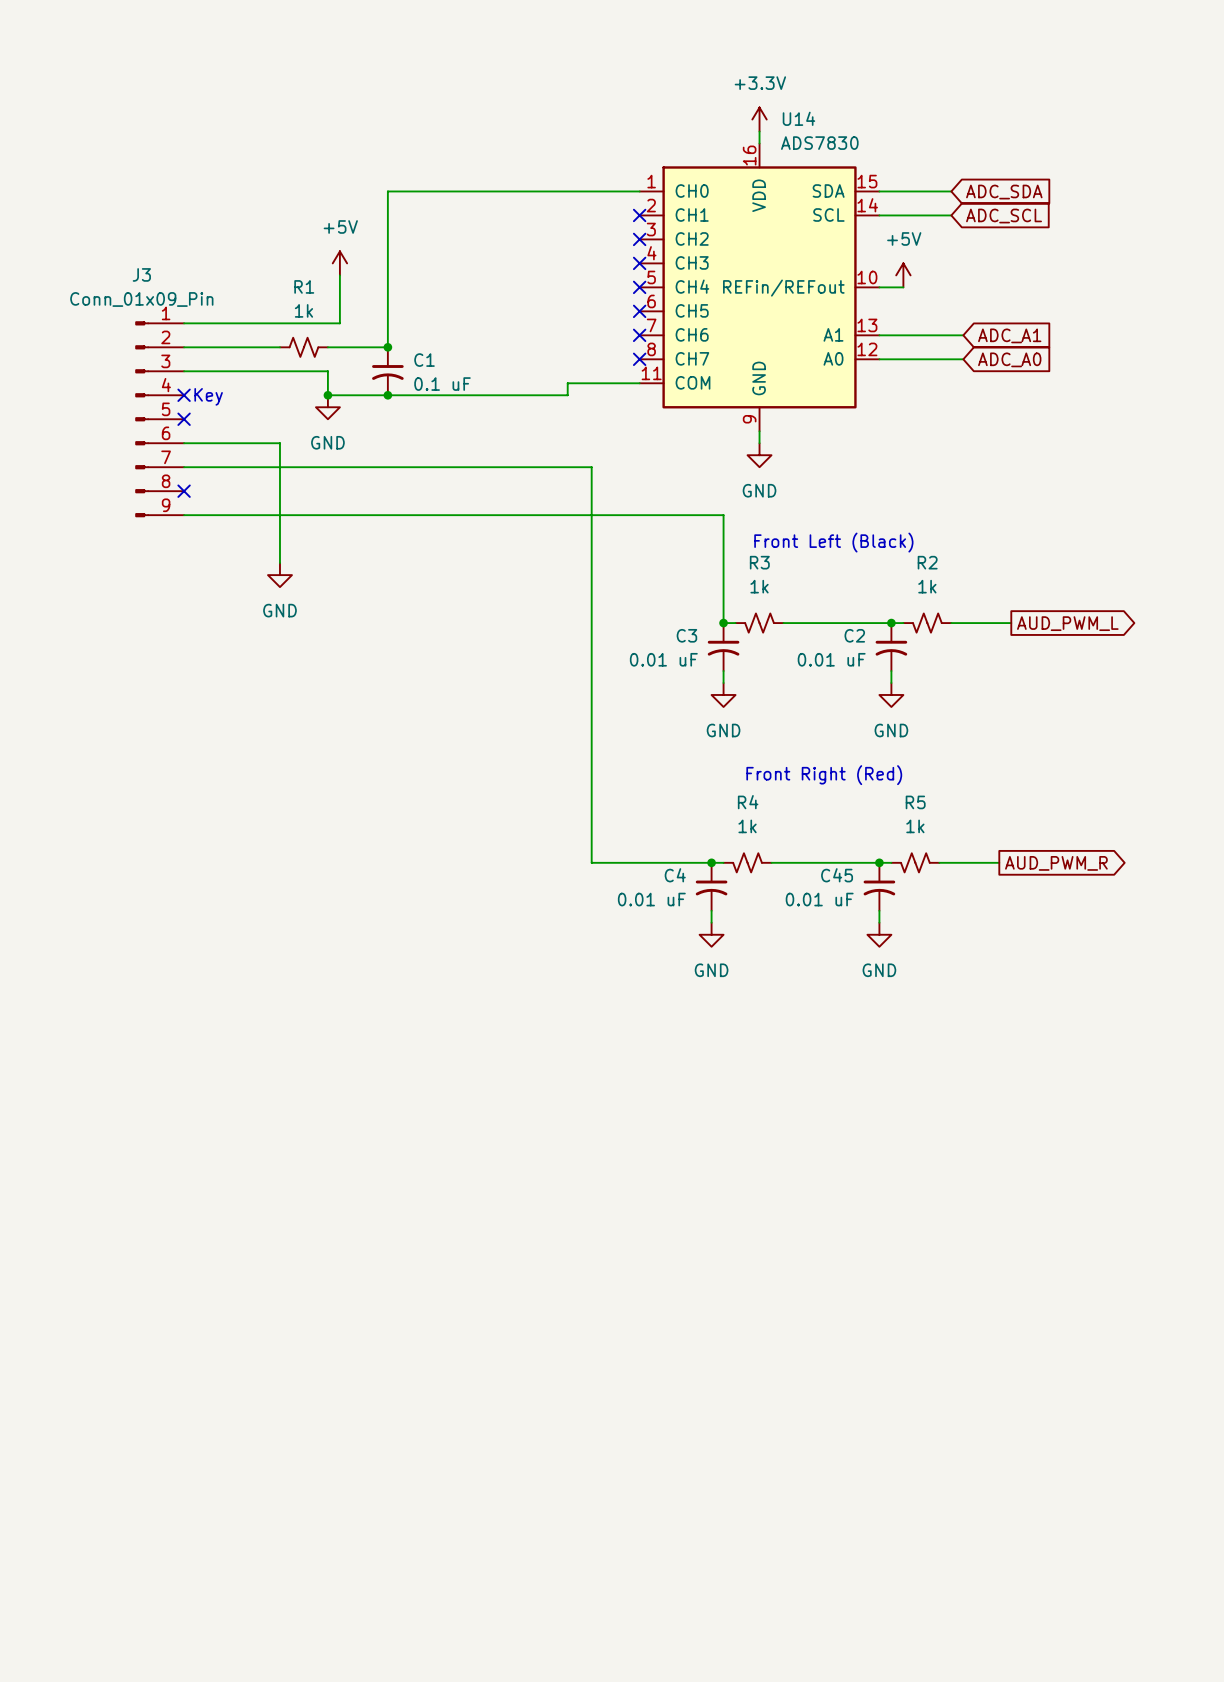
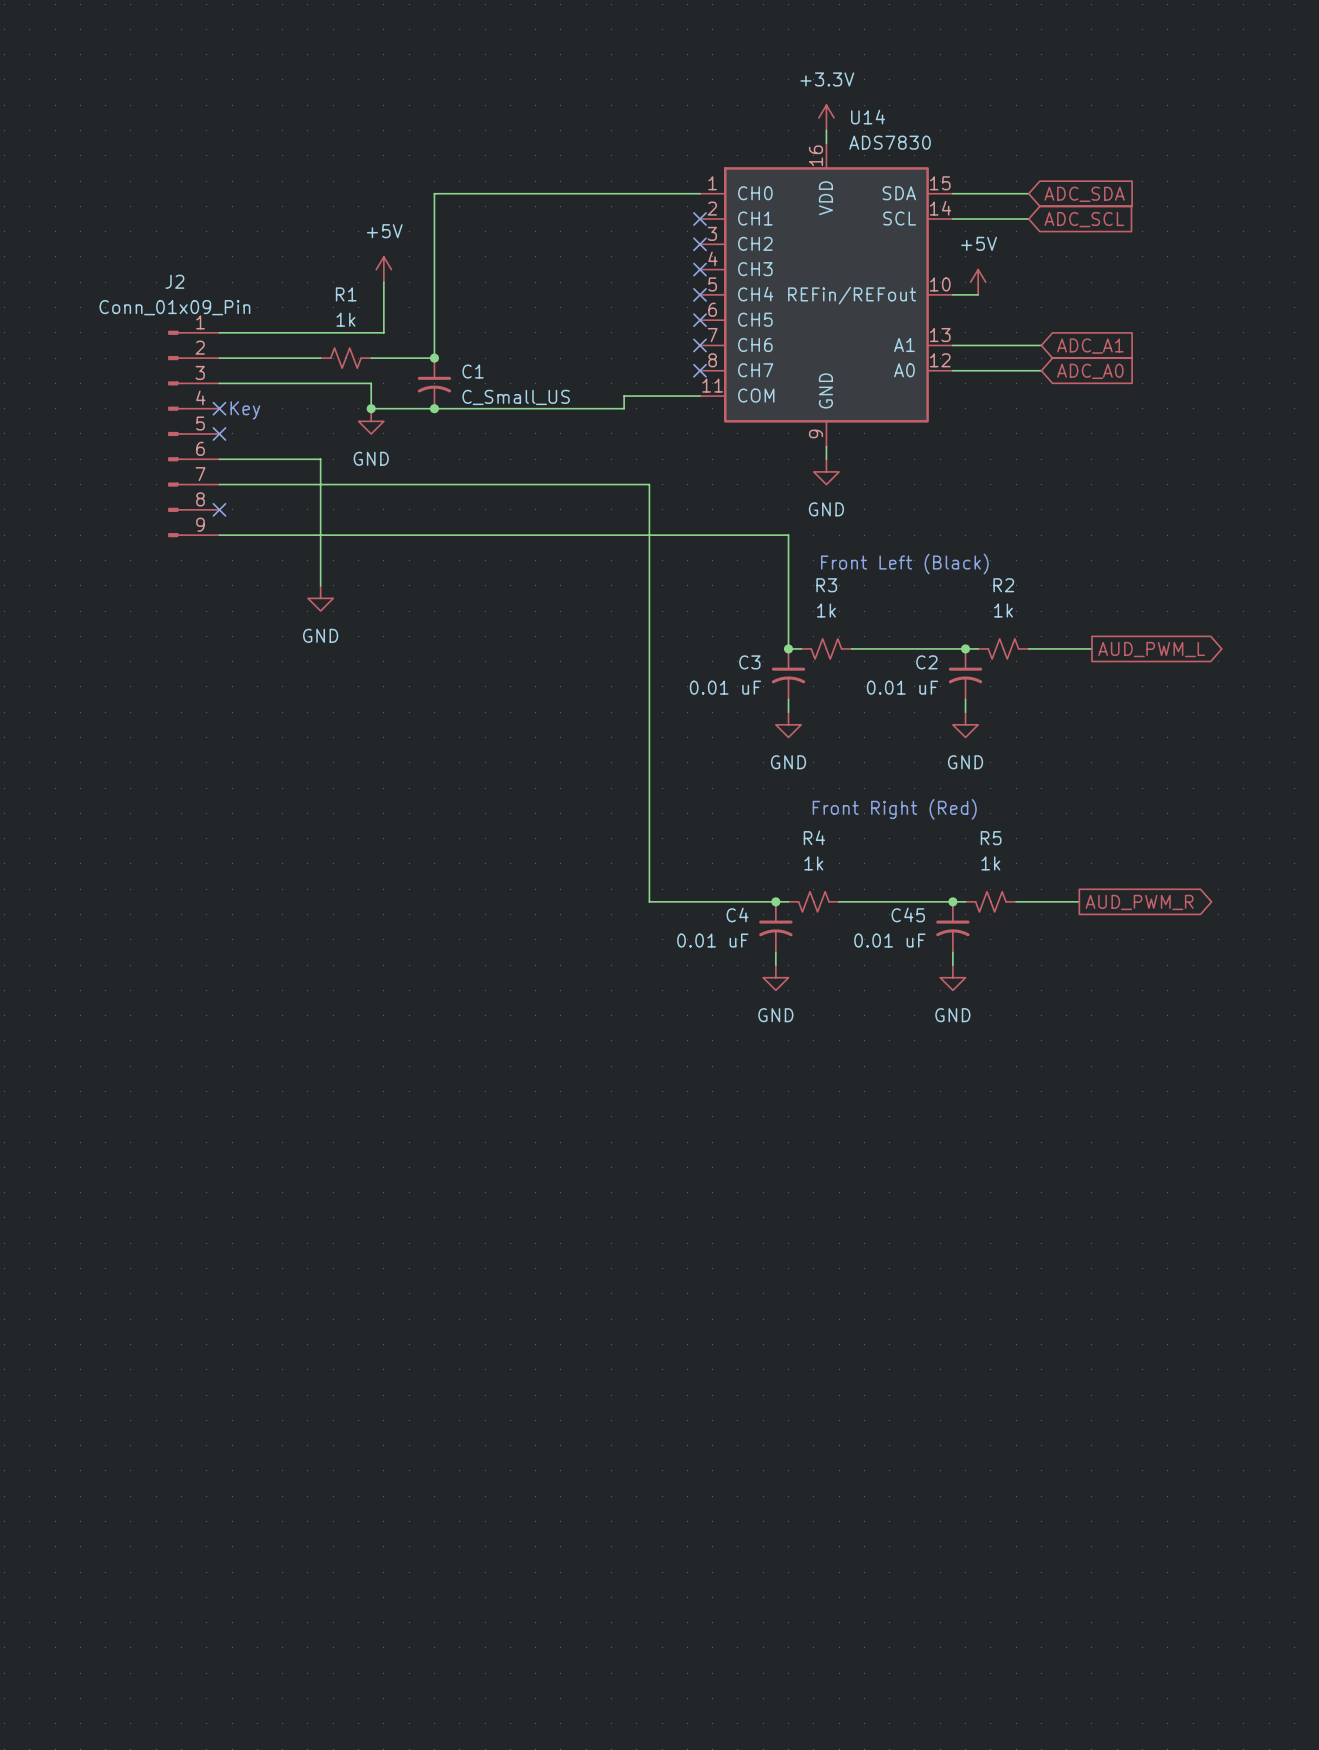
J3 name: J3 (141, 274) -> J2 (174, 281)
C1 value: 0.1 uF (442, 384) -> C_Small_US (516, 397)

